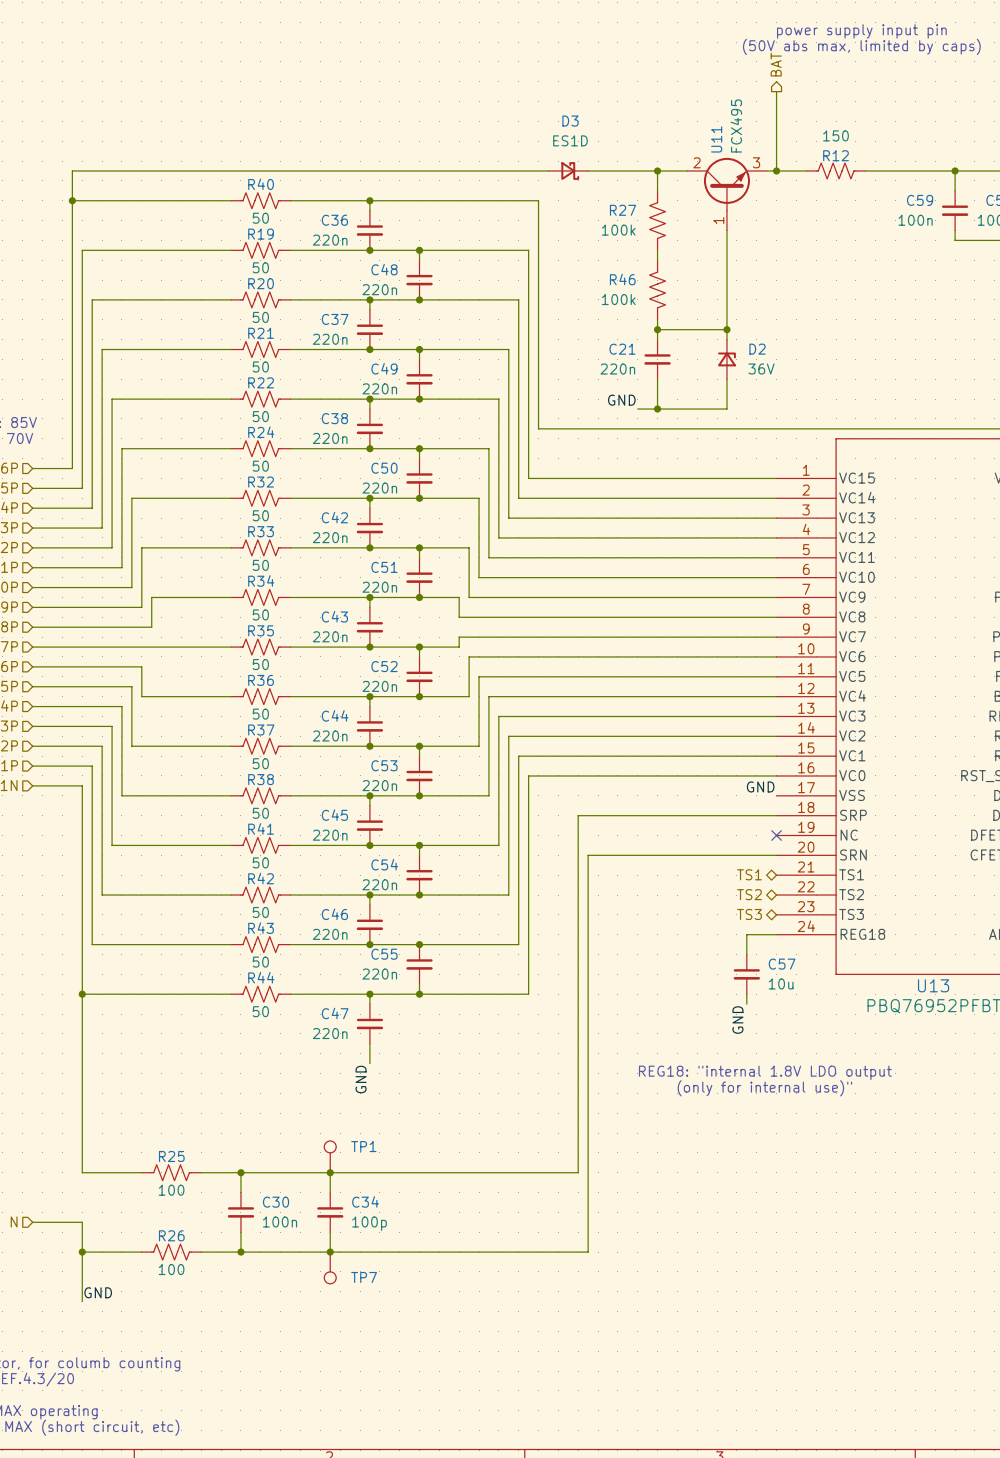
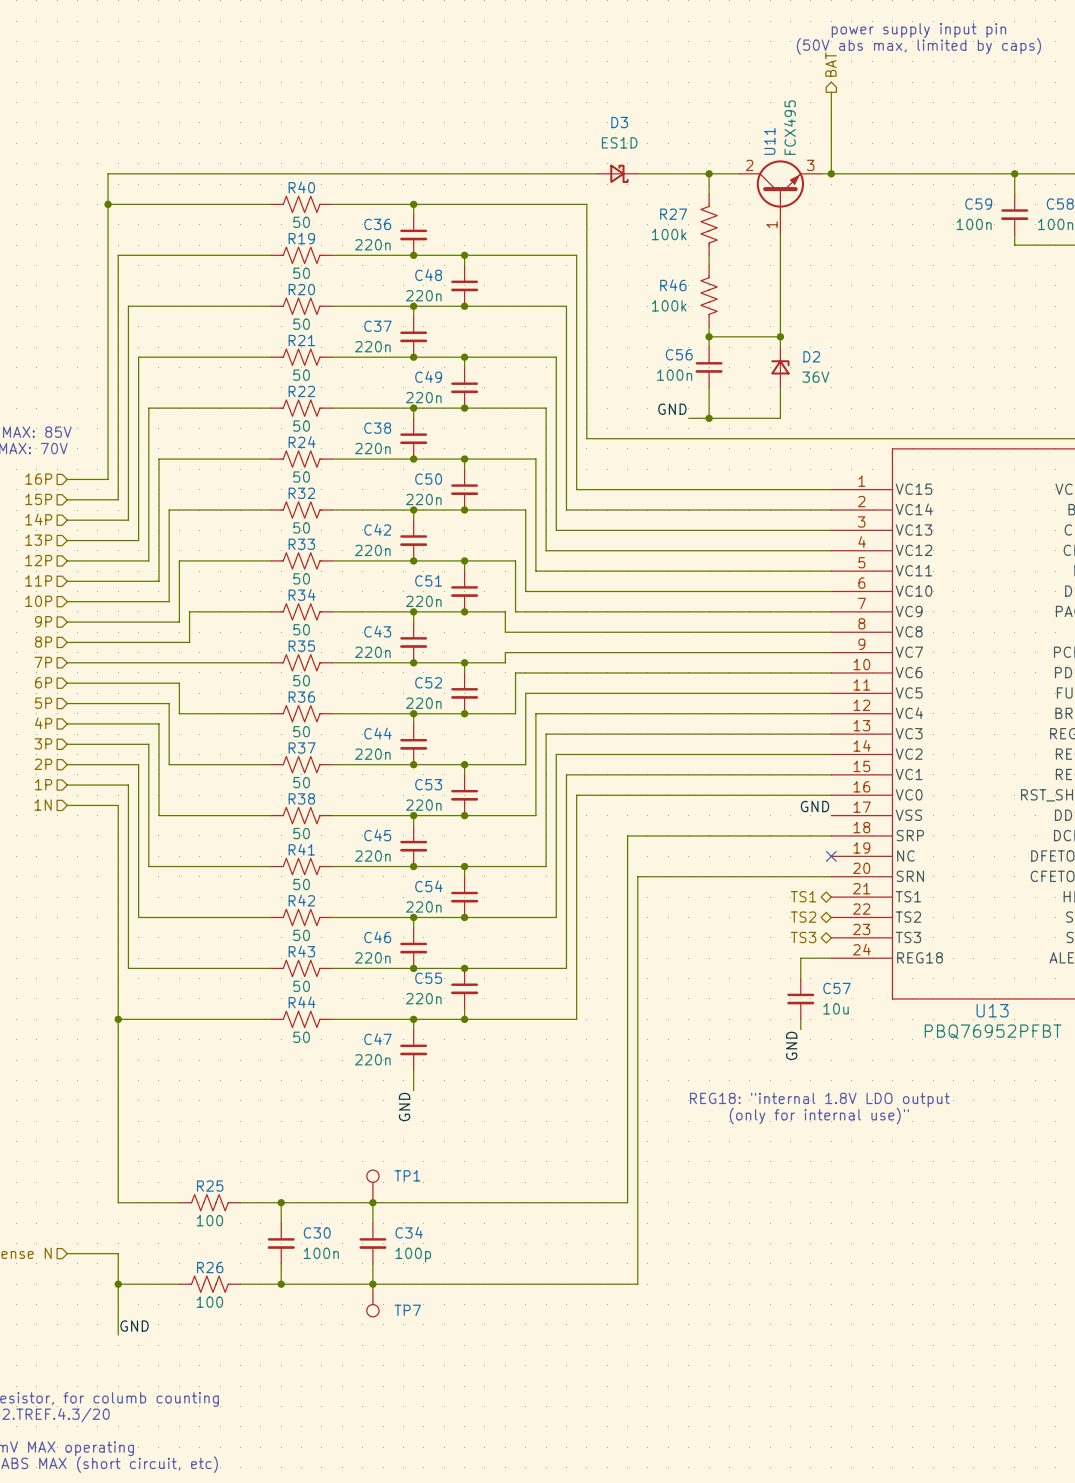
R12: 150 (836, 170) -> none
C21 name: C21 (622, 349) -> C56 (679, 354)
C21 value: 220n (617, 369) -> 100n (674, 375)

